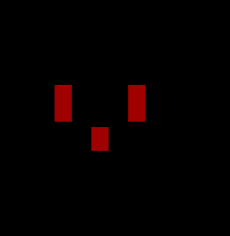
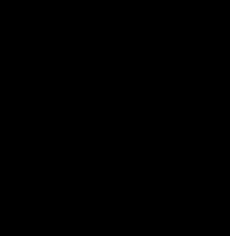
part: (99, 117) -> none

